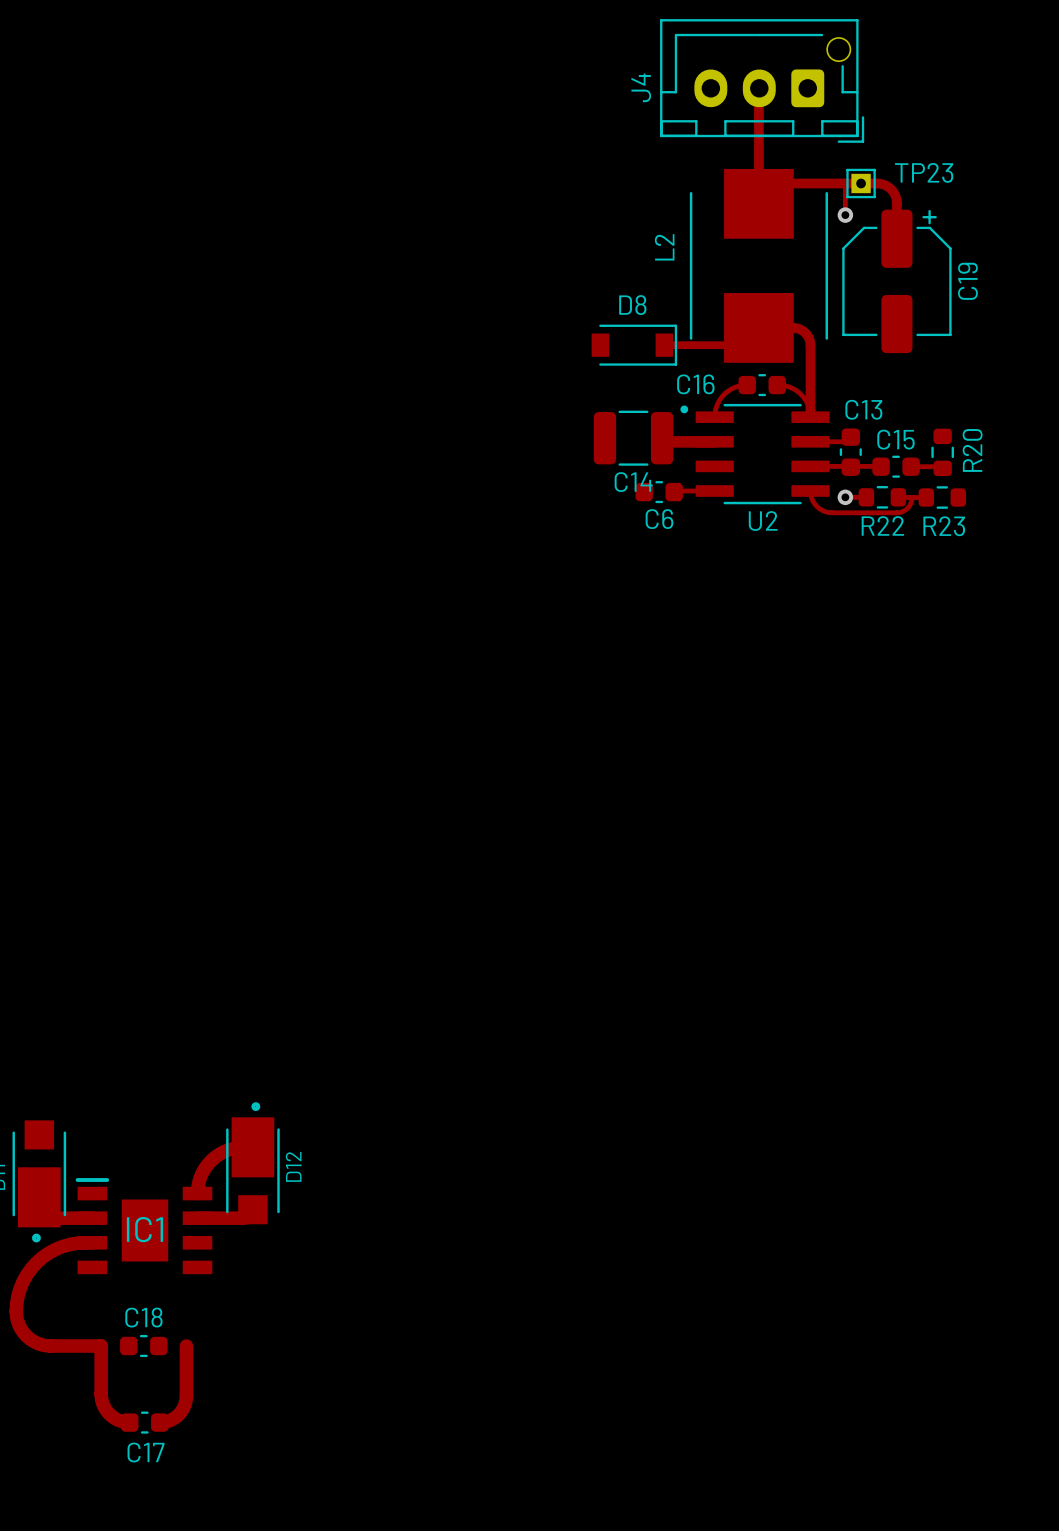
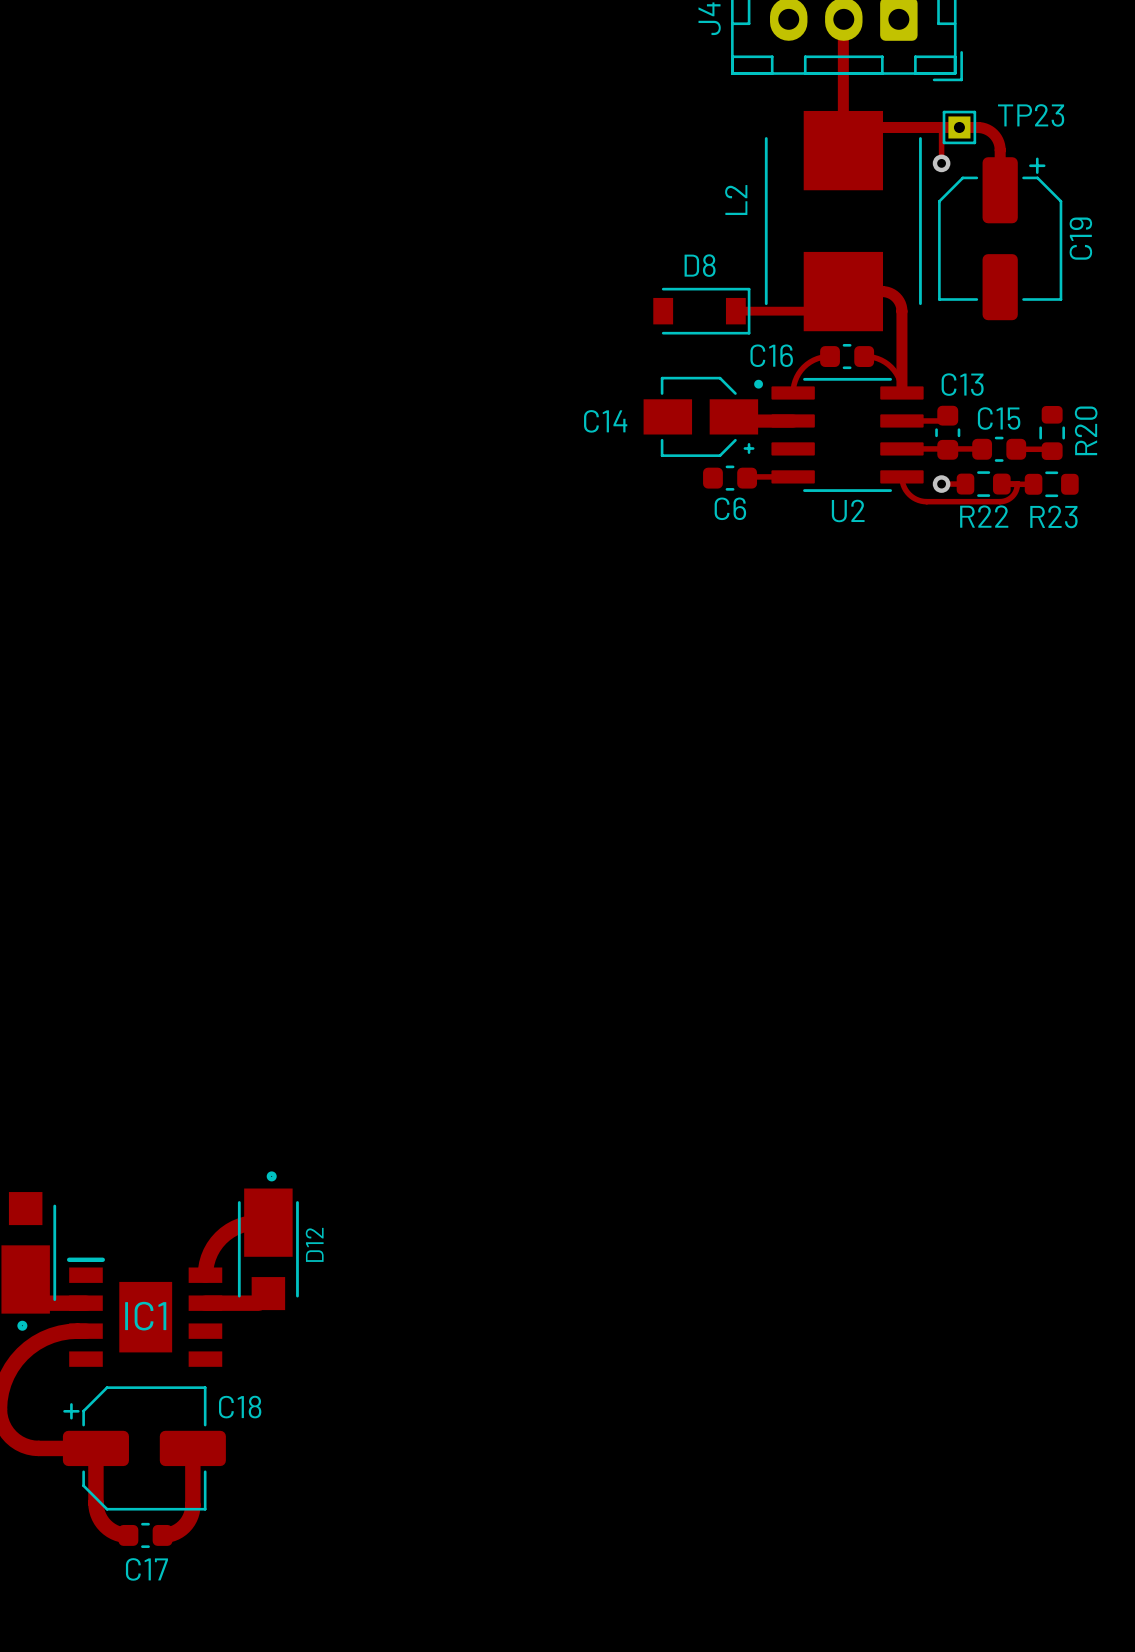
C14 footprint: [593, 410, 674, 466] -> [643, 376, 759, 457]
C14 name position: C14 (633, 482) -> C14 (605, 421)
C18 name position: C18 (143, 1317) -> C18 (240, 1407)
C18 footprint: [120, 1334, 168, 1358] -> [62, 1386, 226, 1511]

